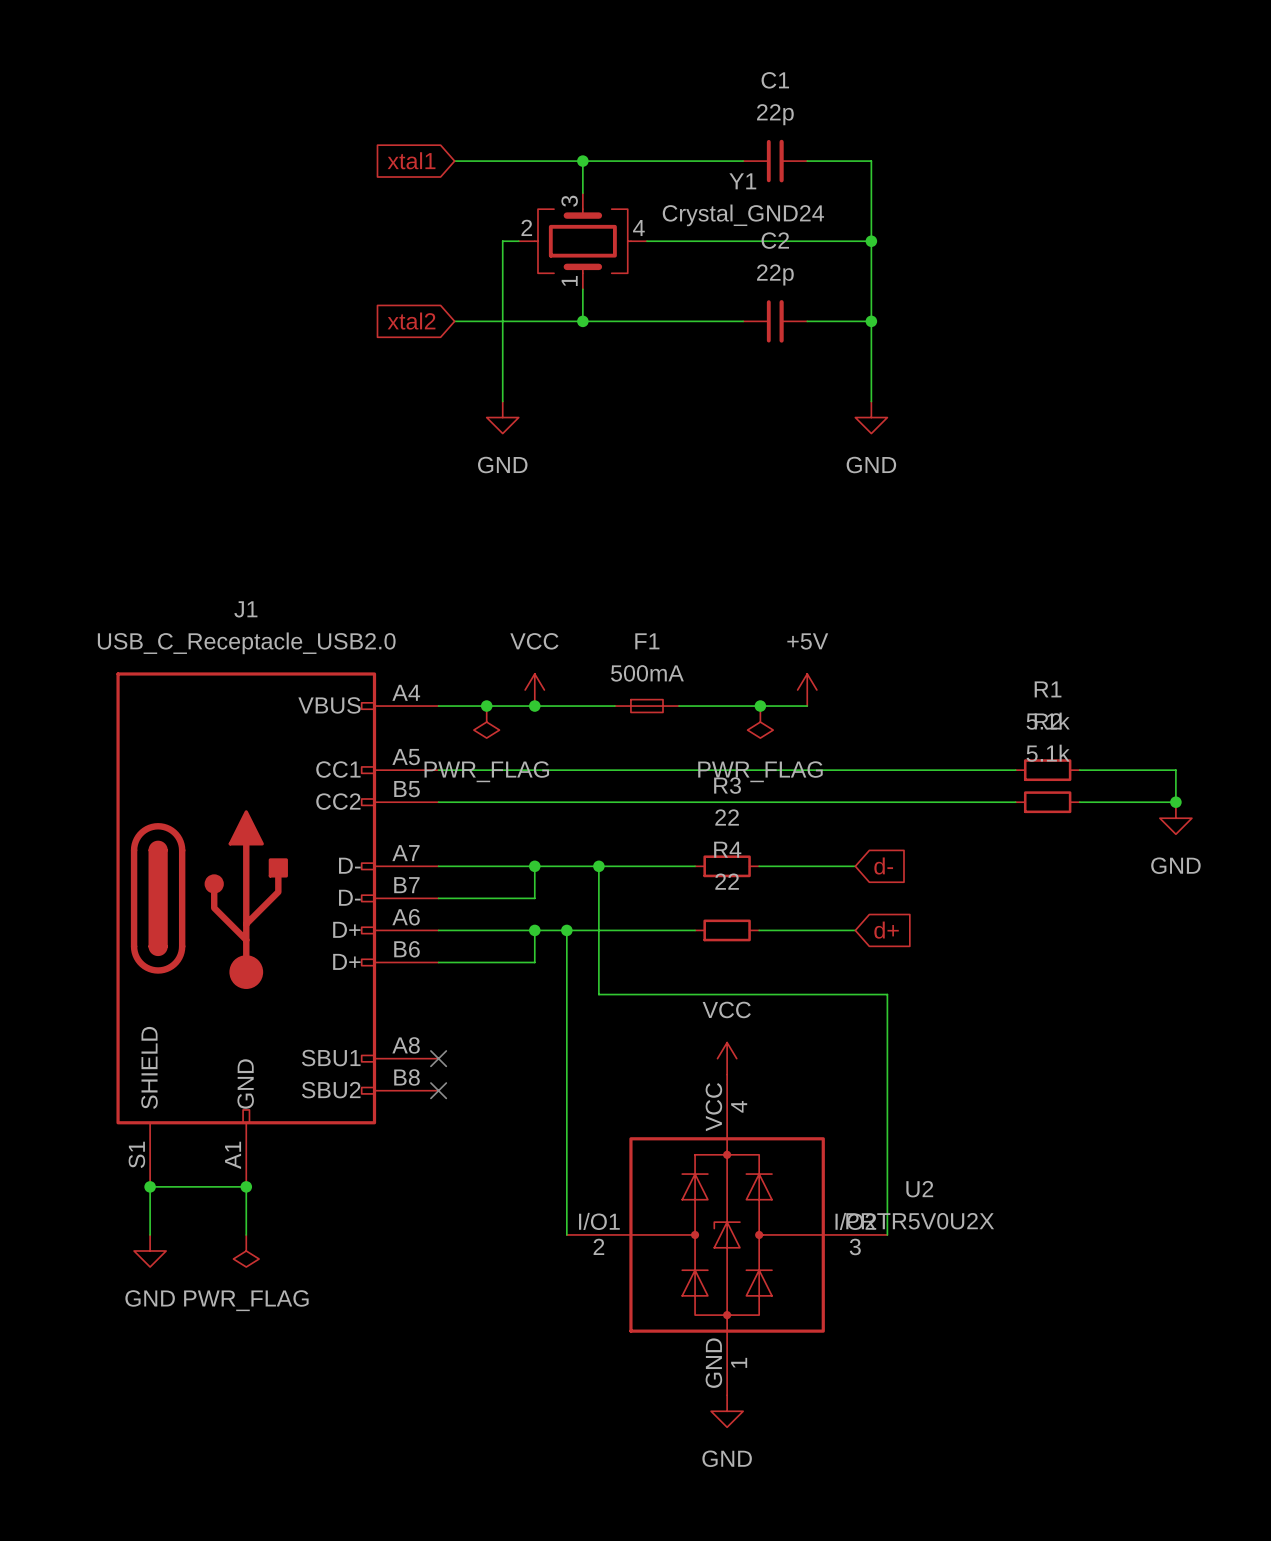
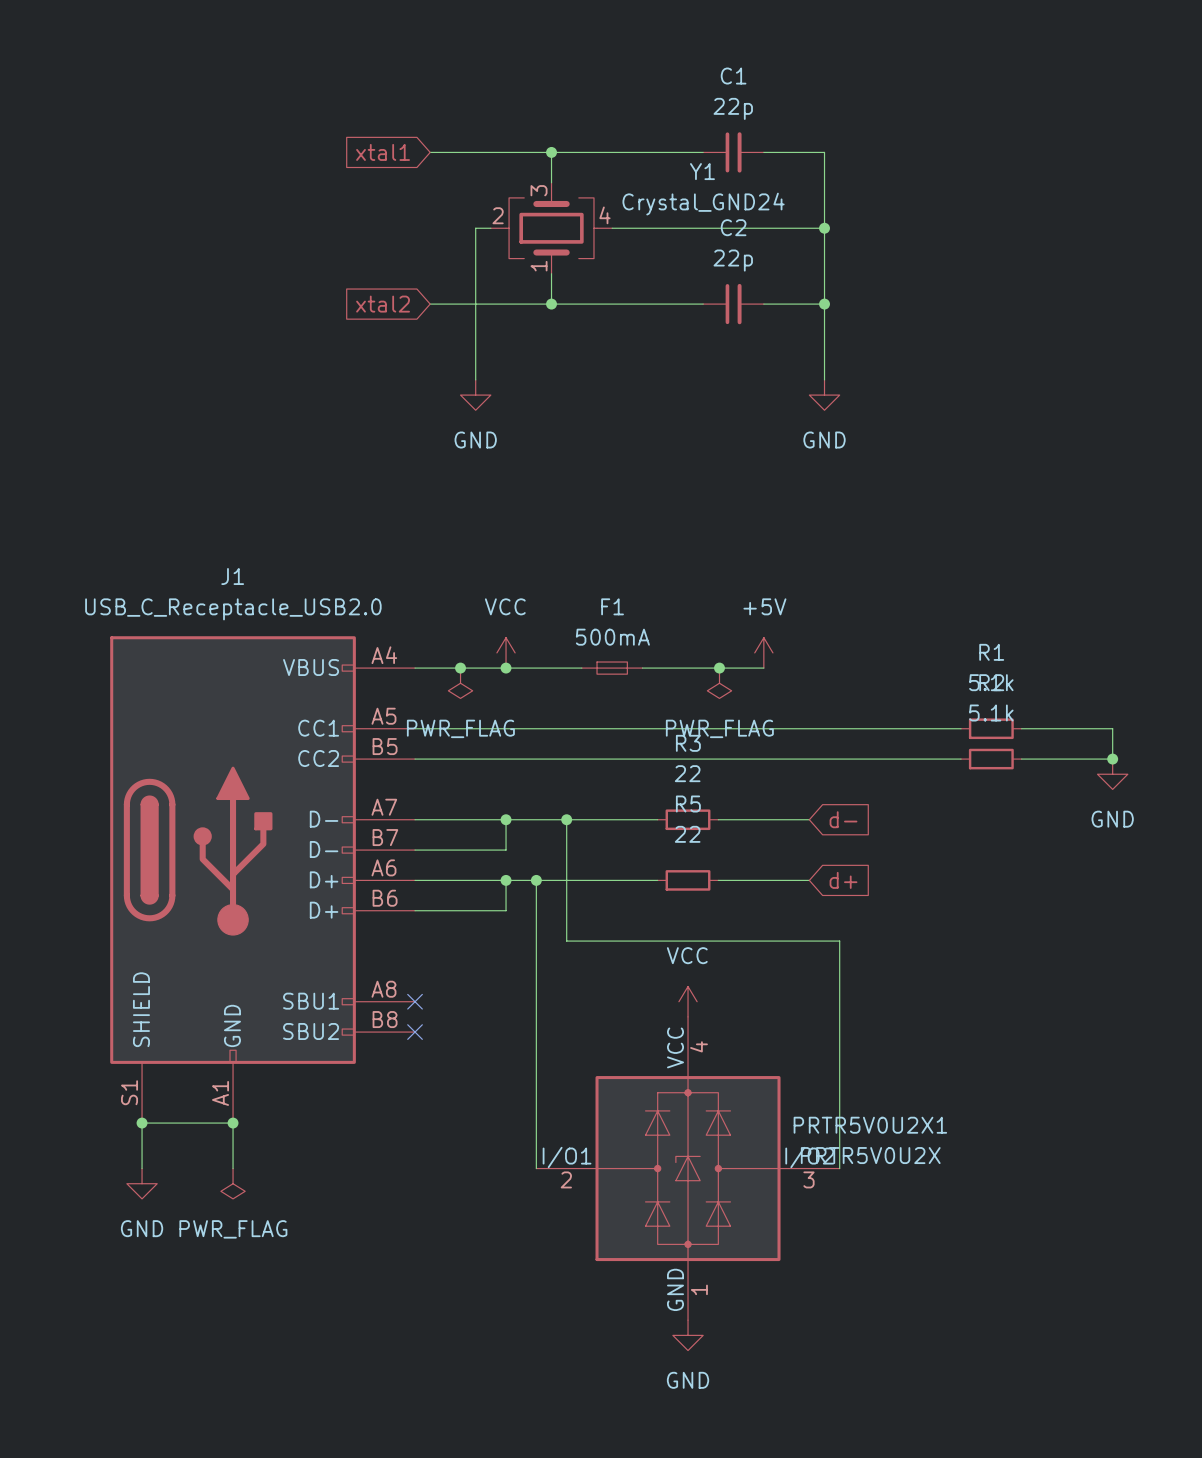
R4 name: R4 (727, 849) -> R5 (688, 804)
U2 name: U2 (919, 1189) -> PRTR5V0U2X1 (870, 1125)

